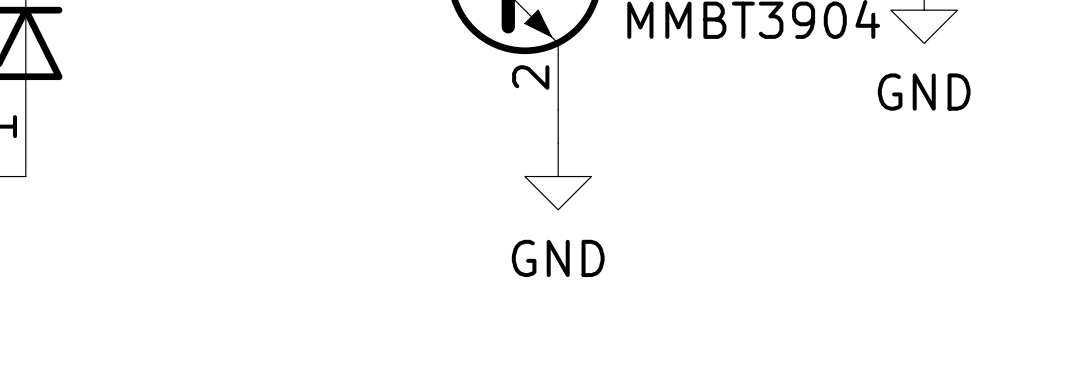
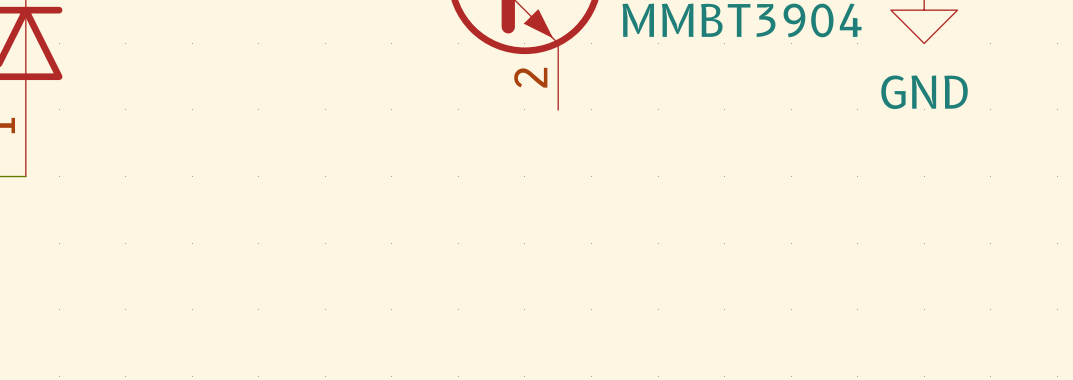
wire: (558, 109) (558, 143) -> none
power symbol: GND (558, 176) -> none

